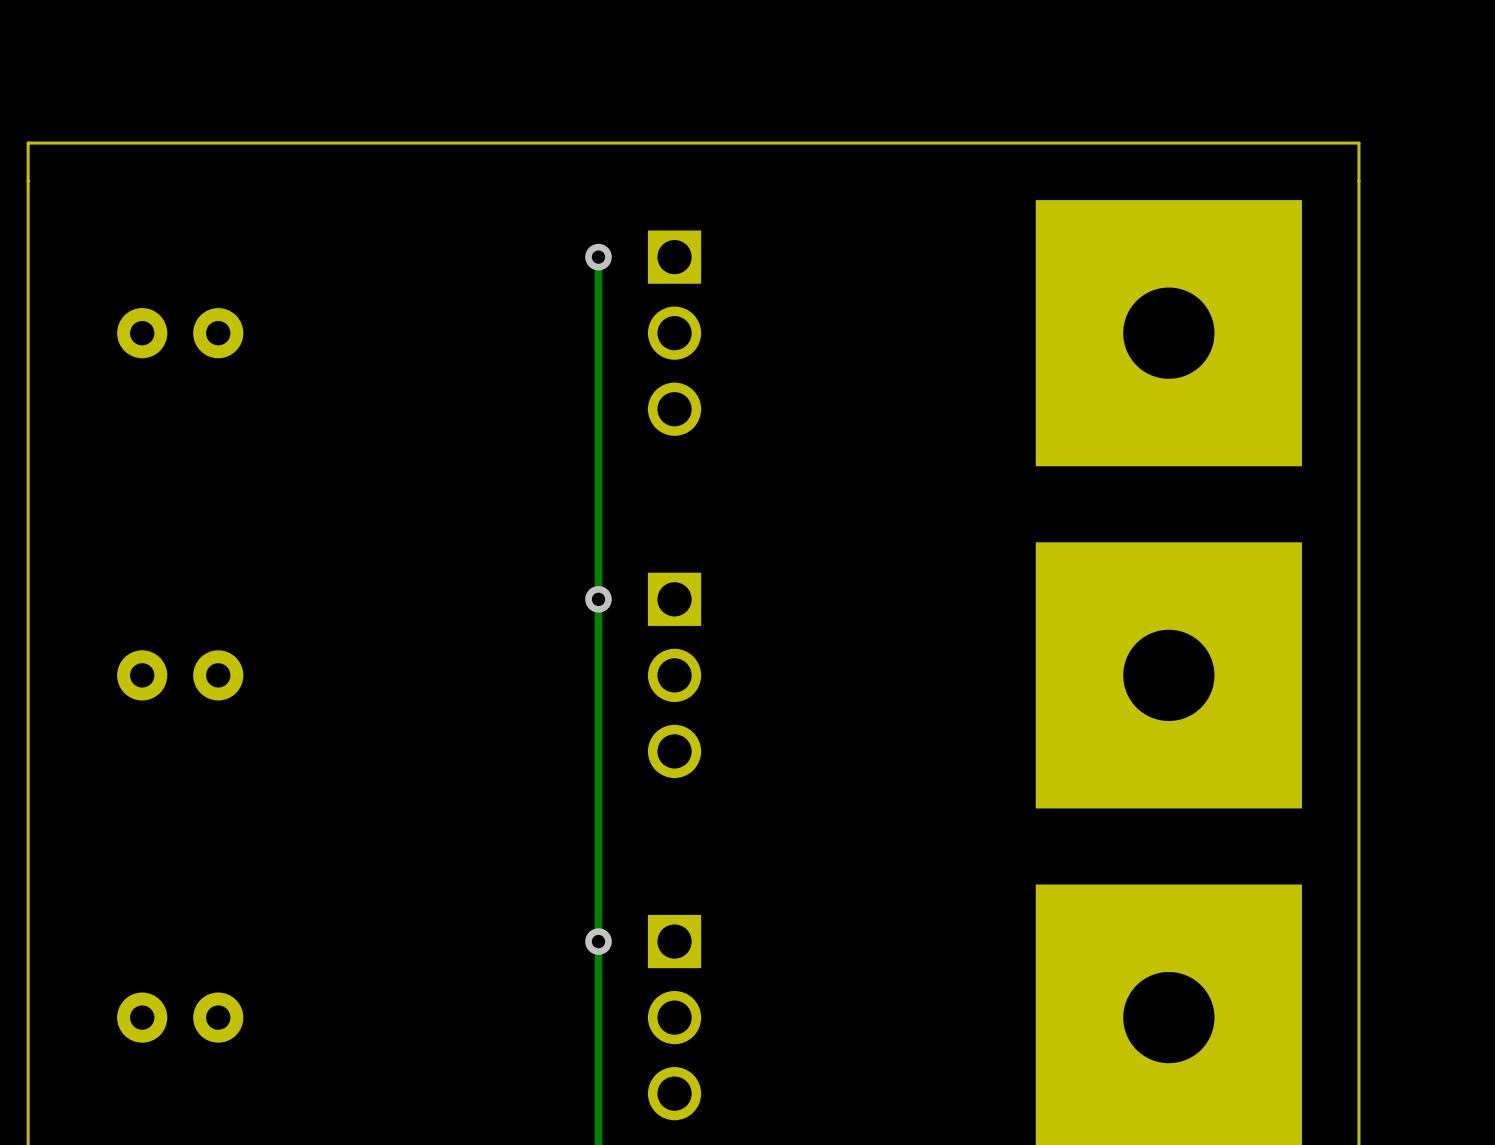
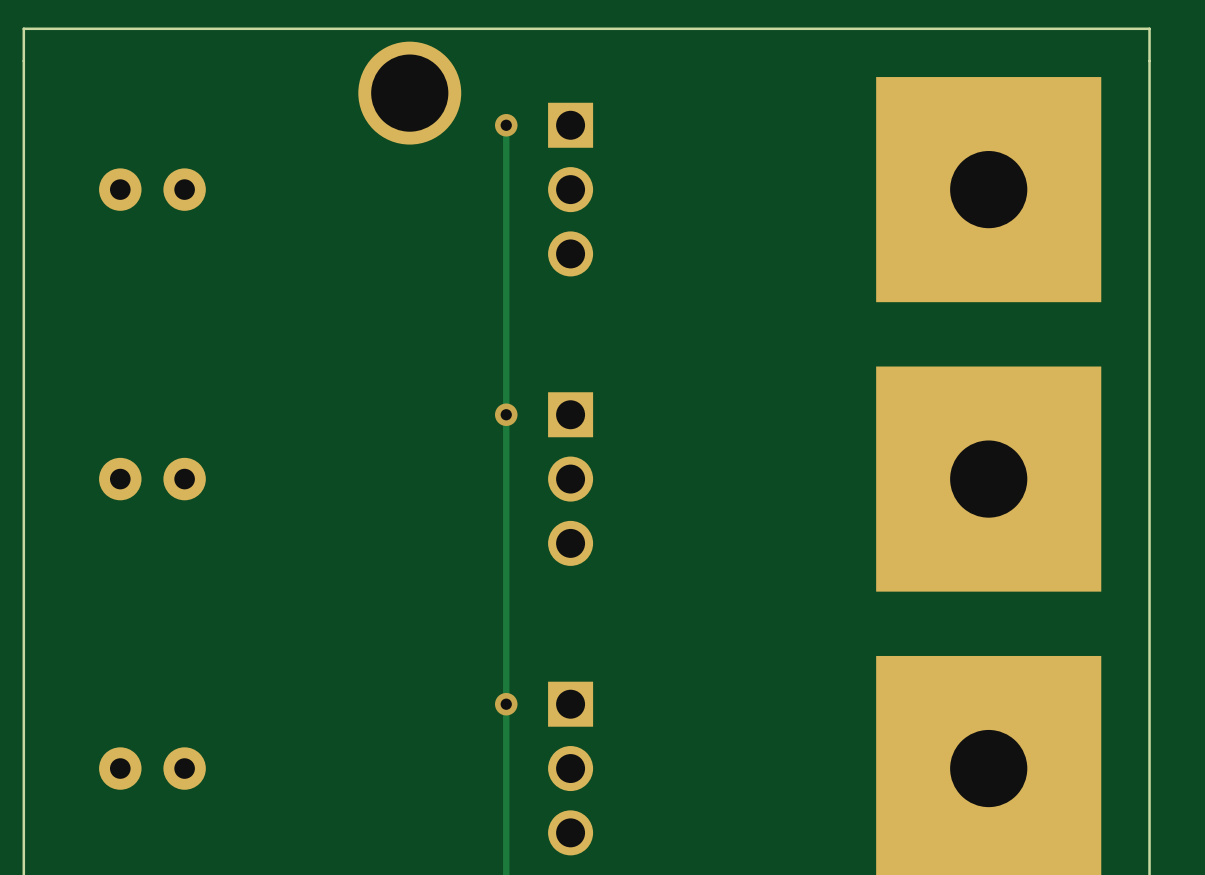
part: none -> (409, 93)

